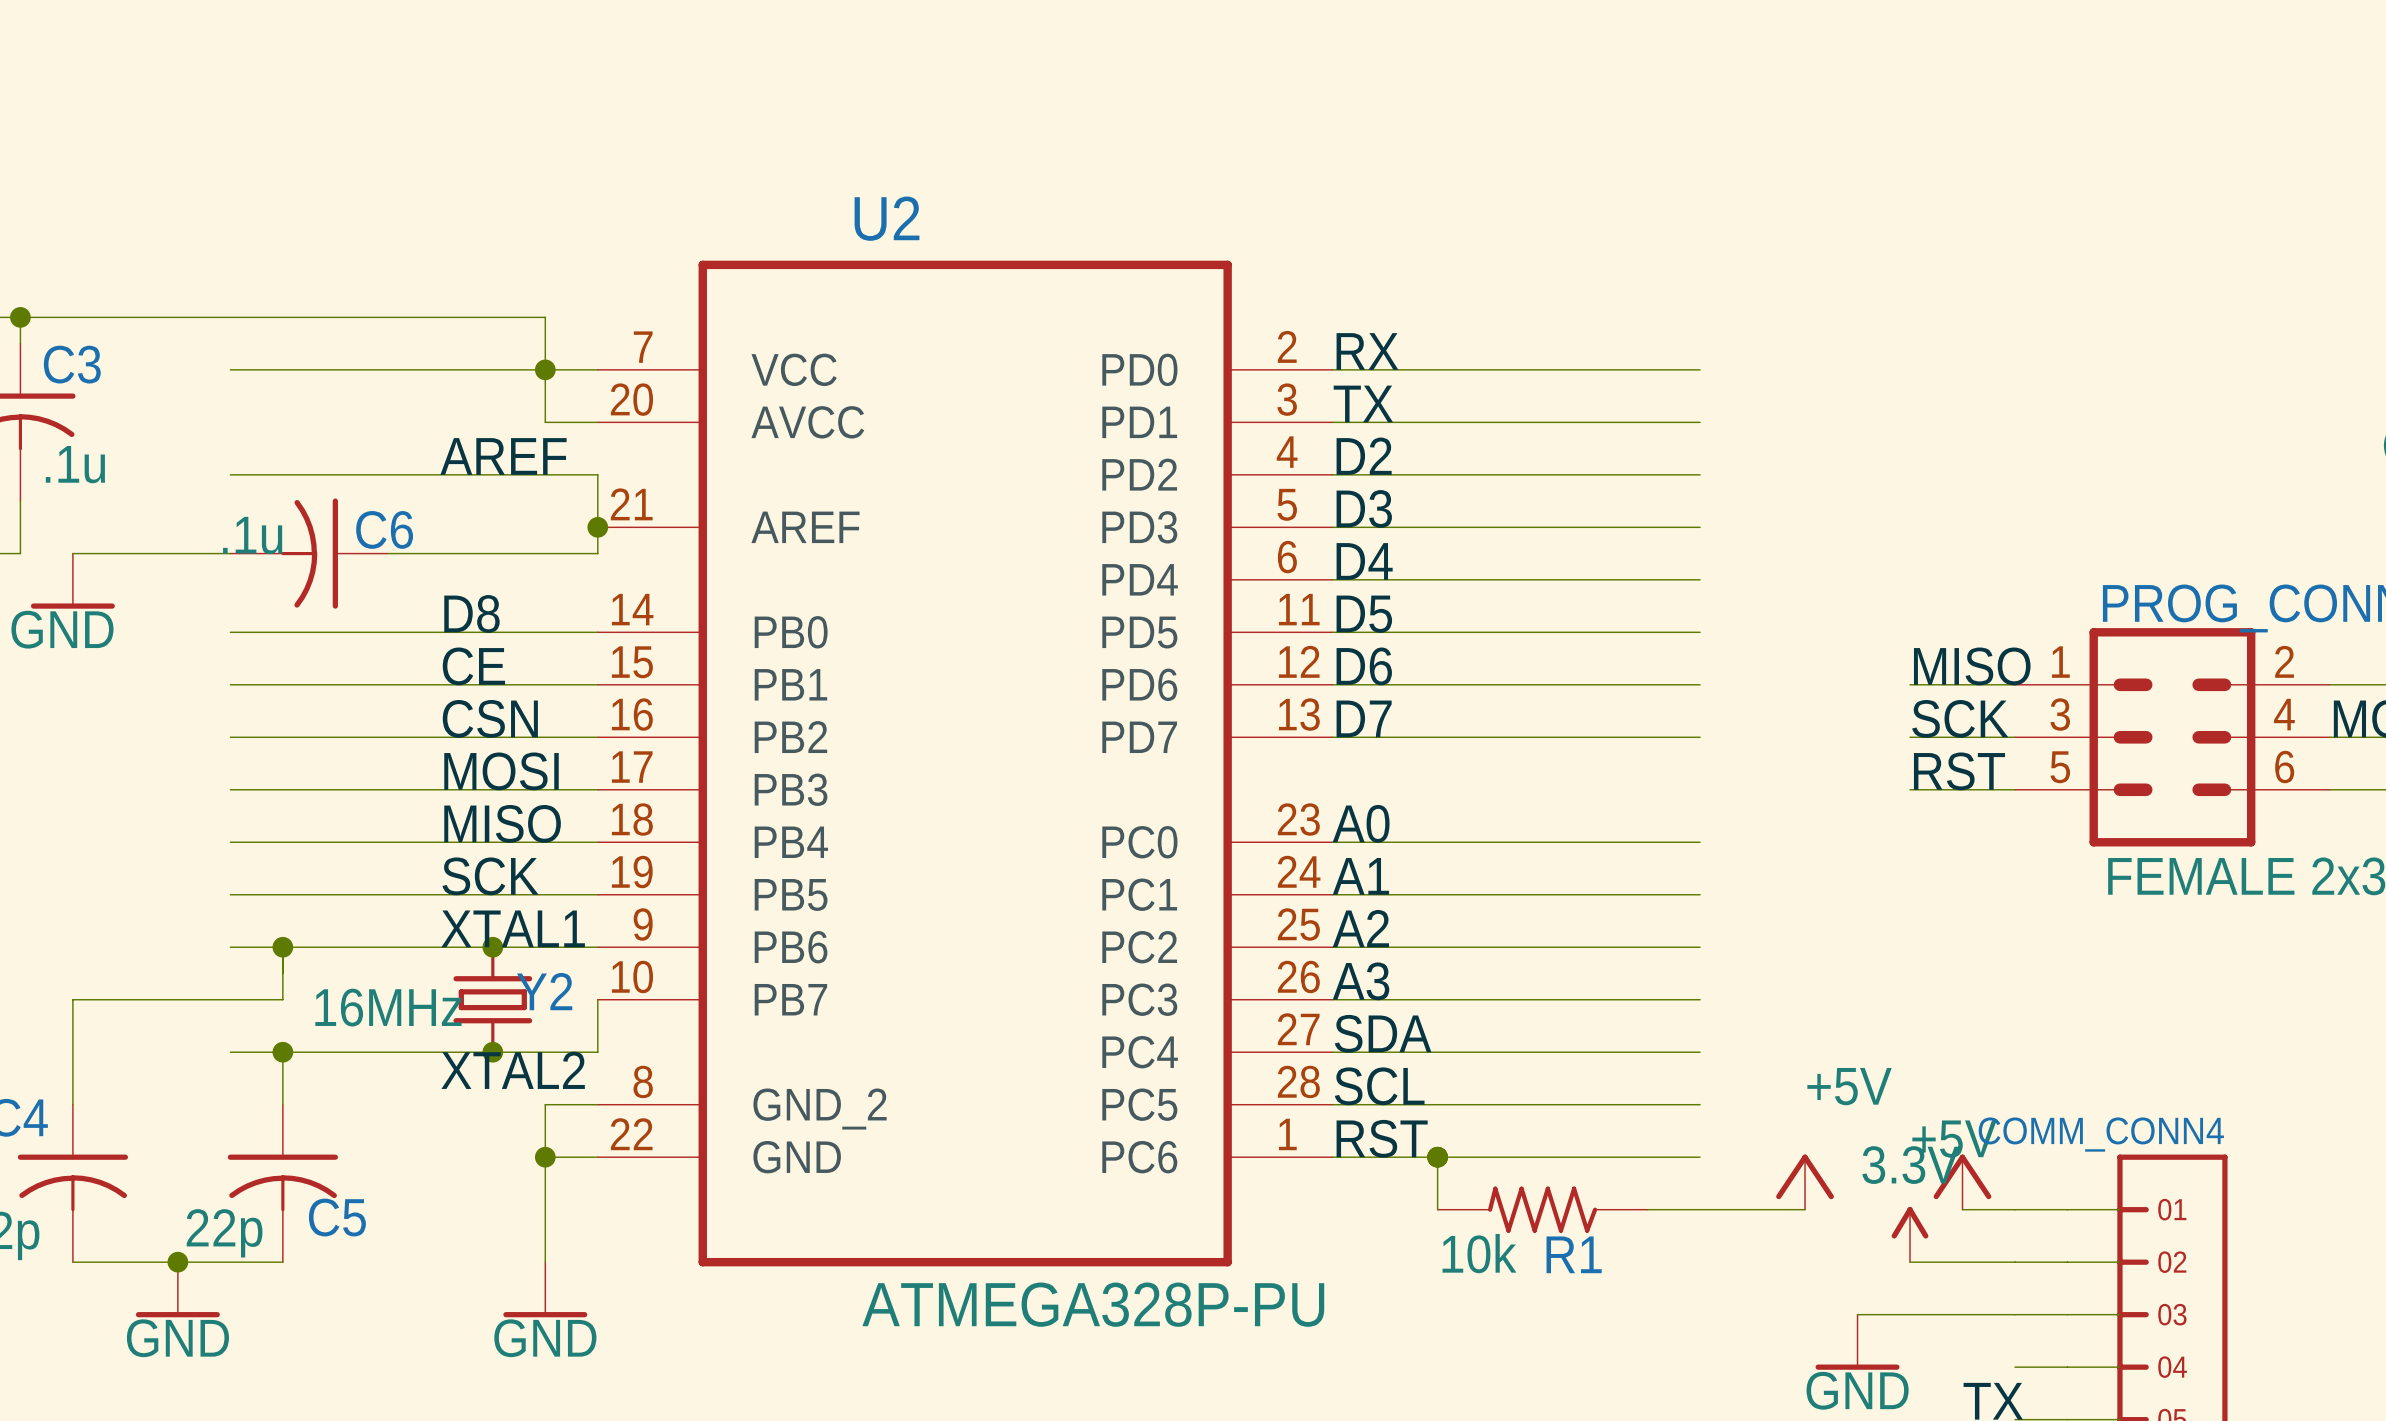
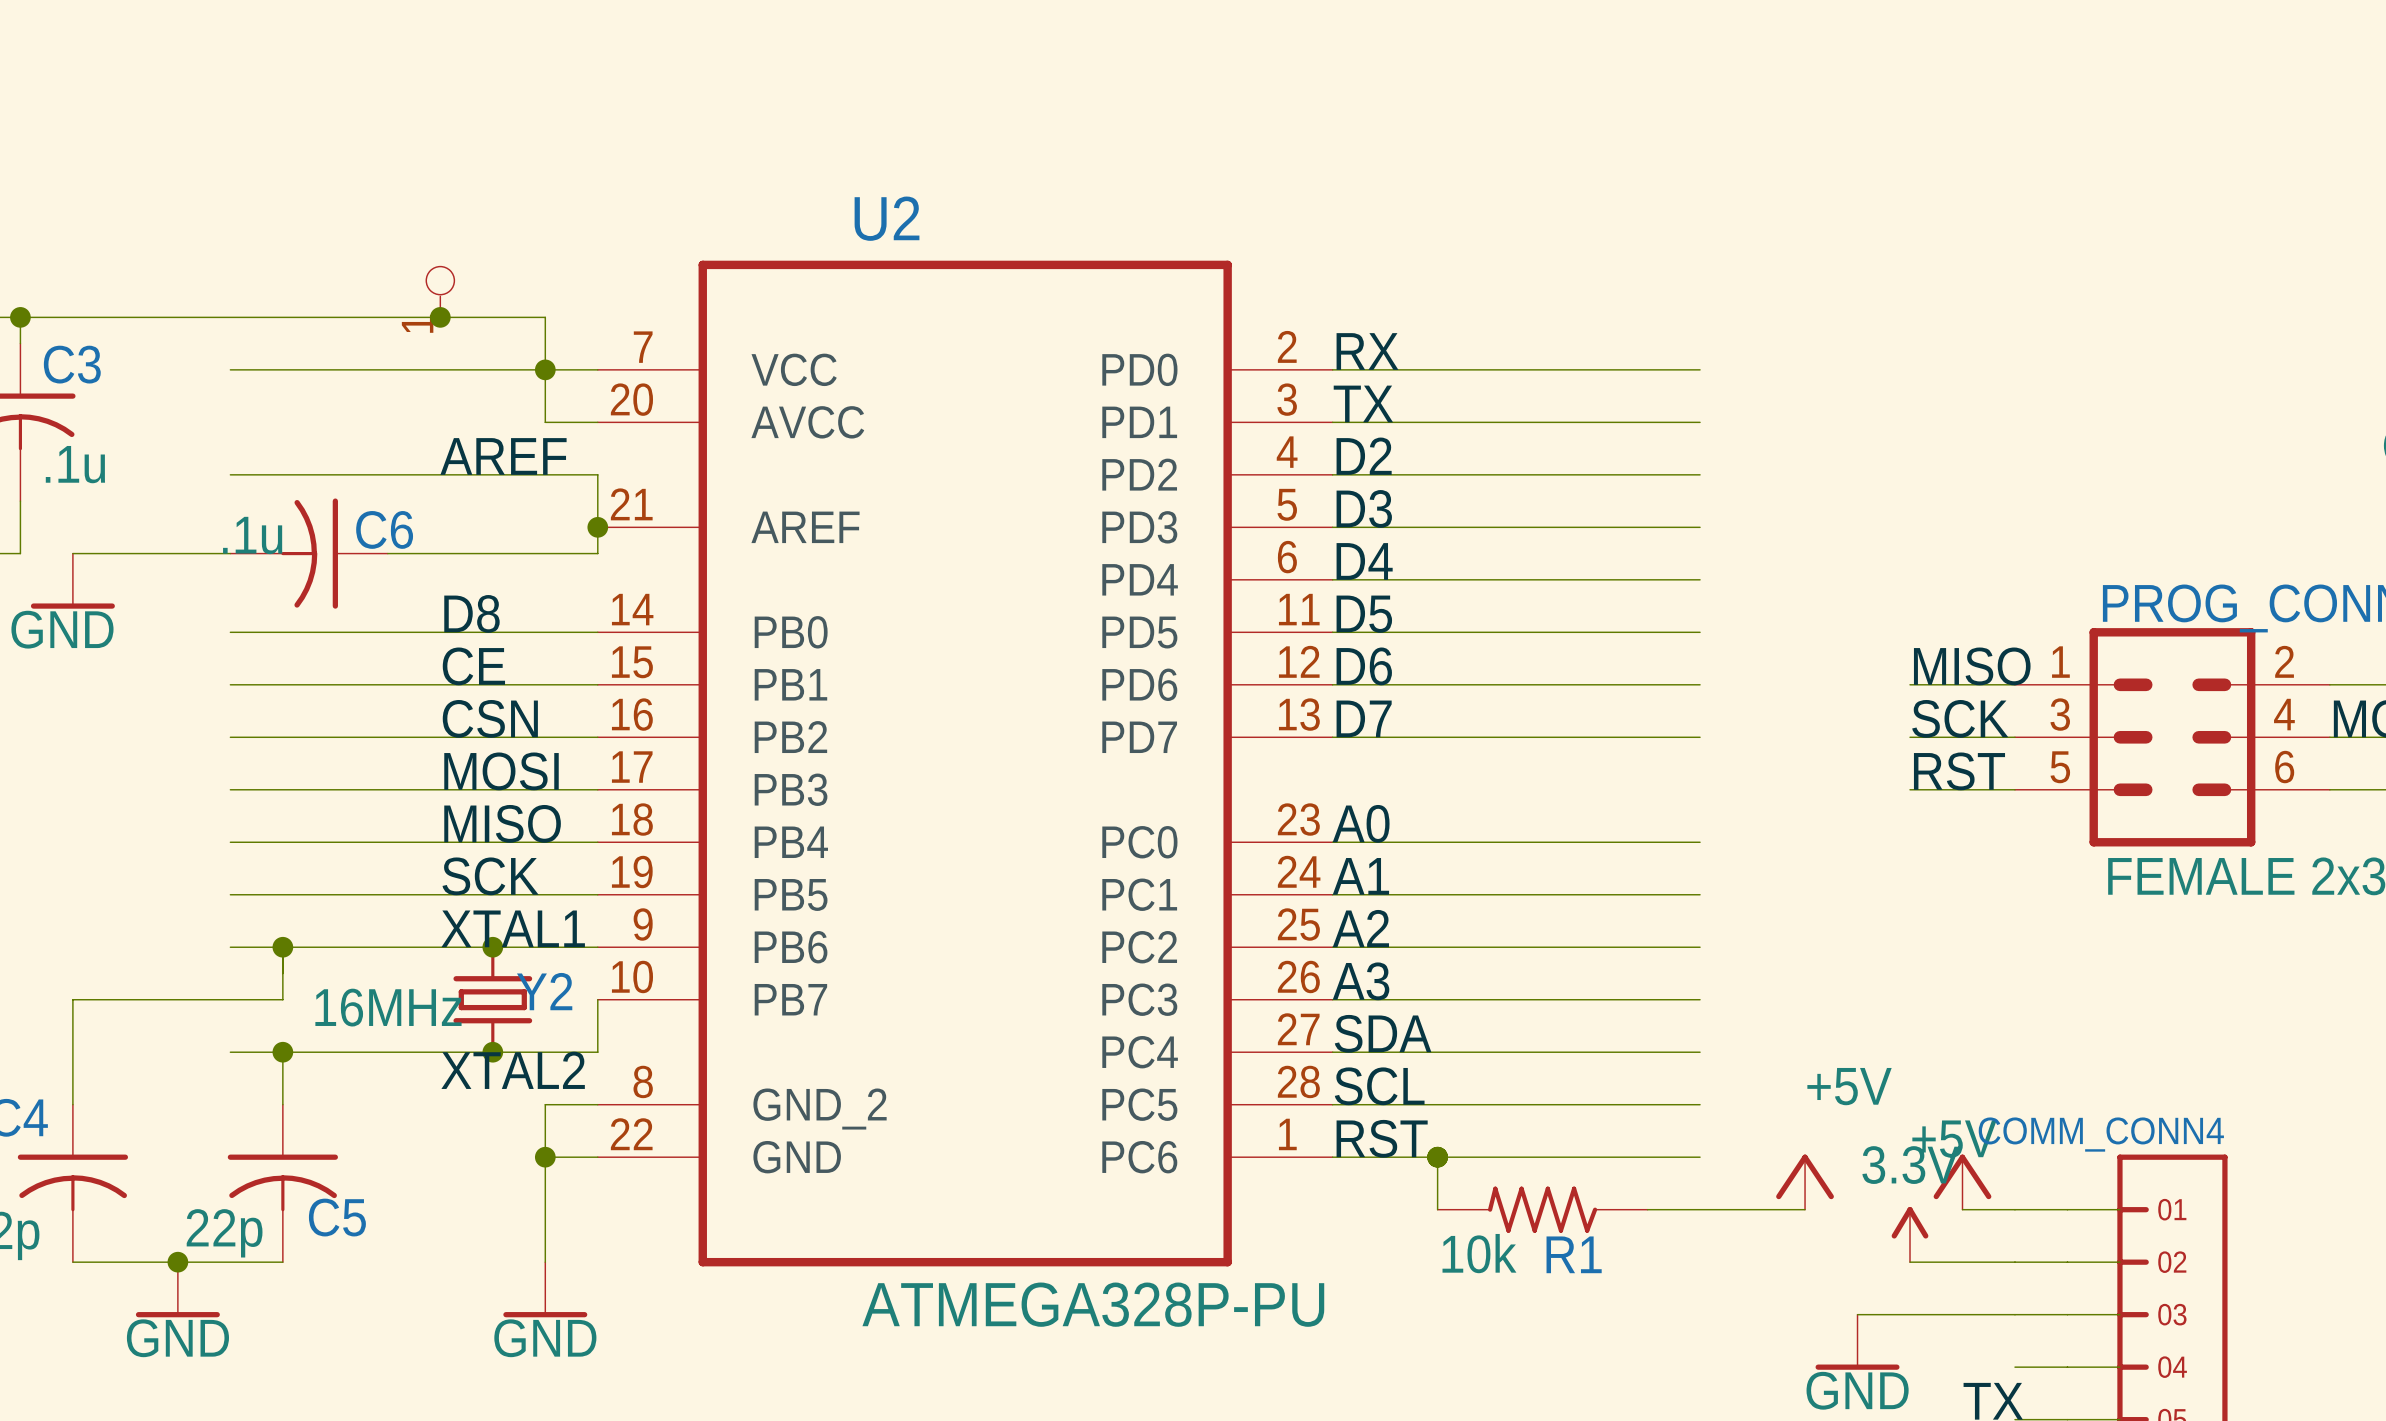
part: none -> (440, 291)
junction: none -> (440, 317)

